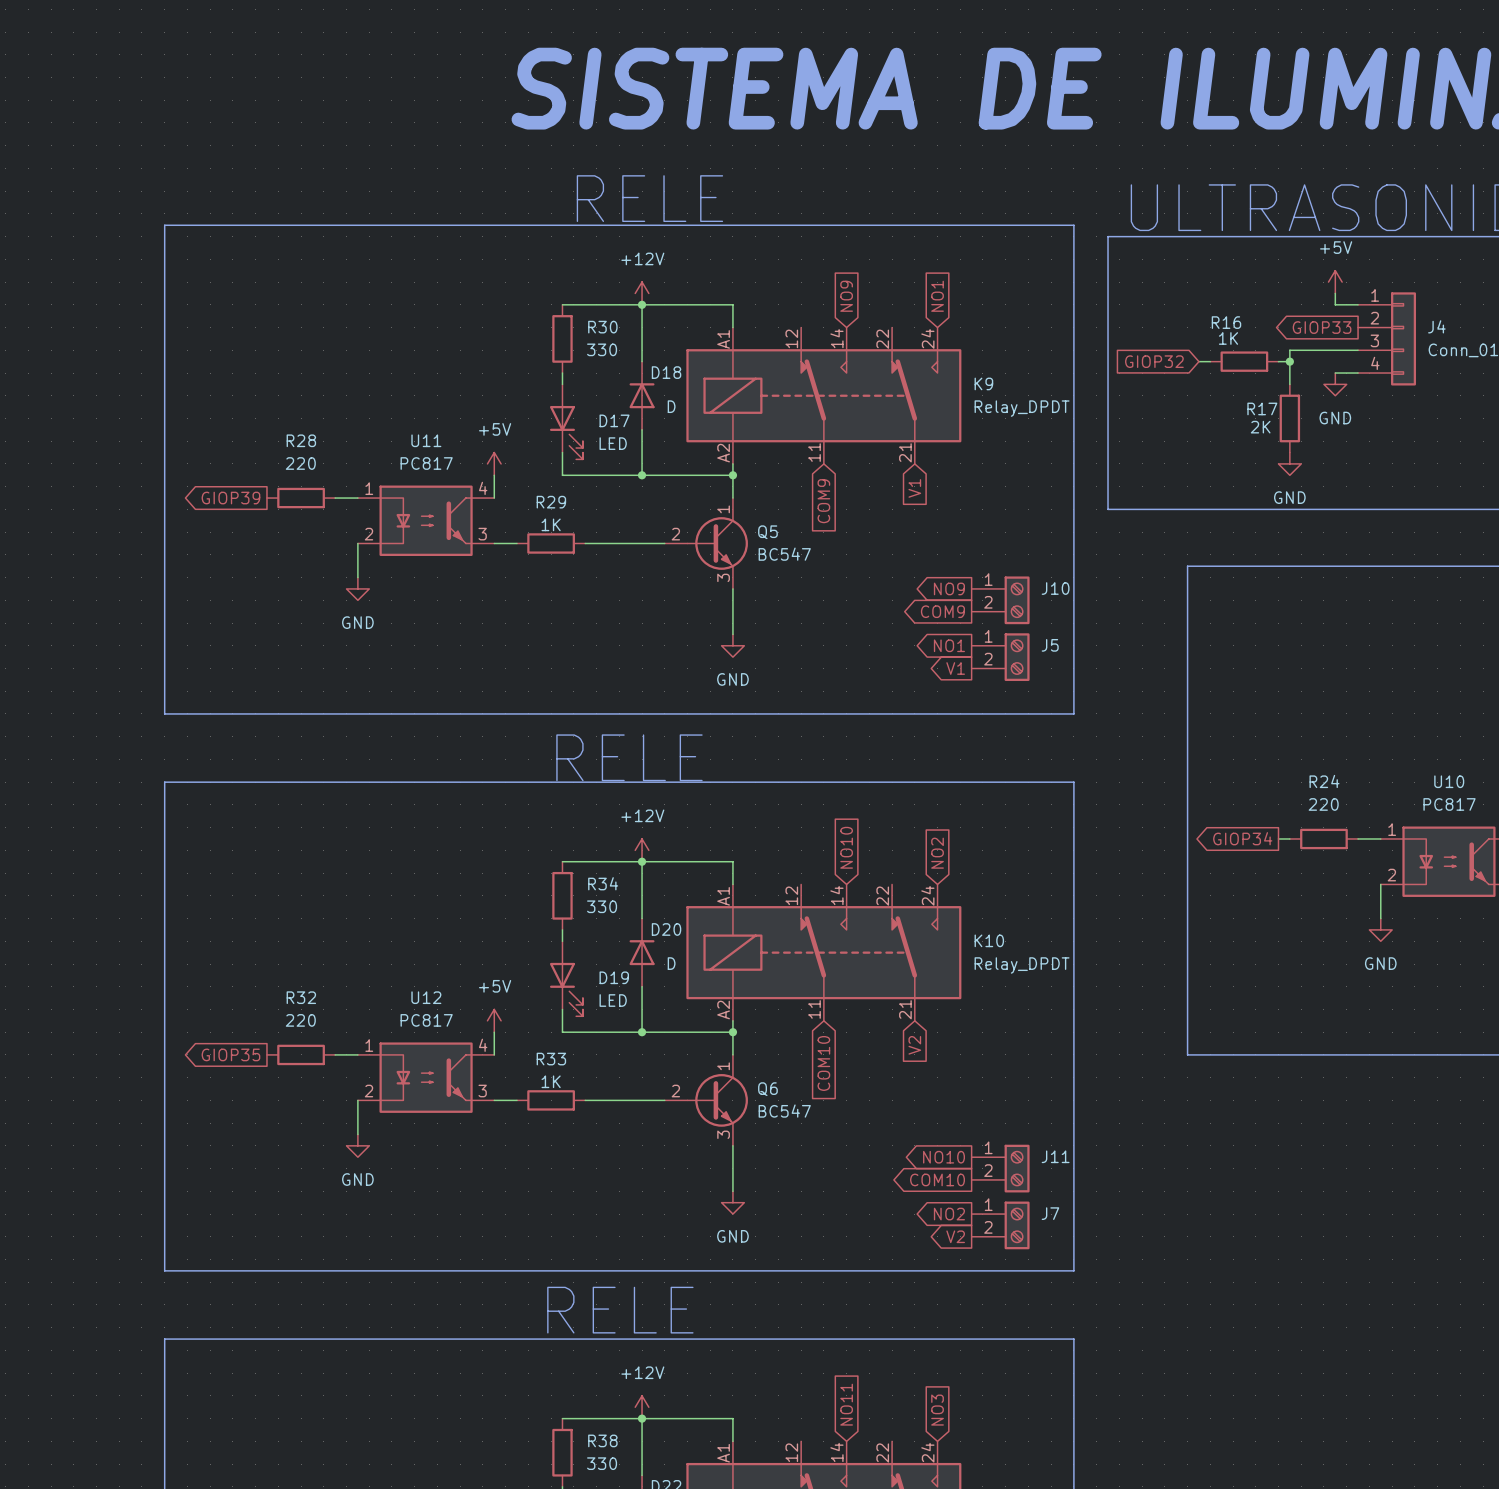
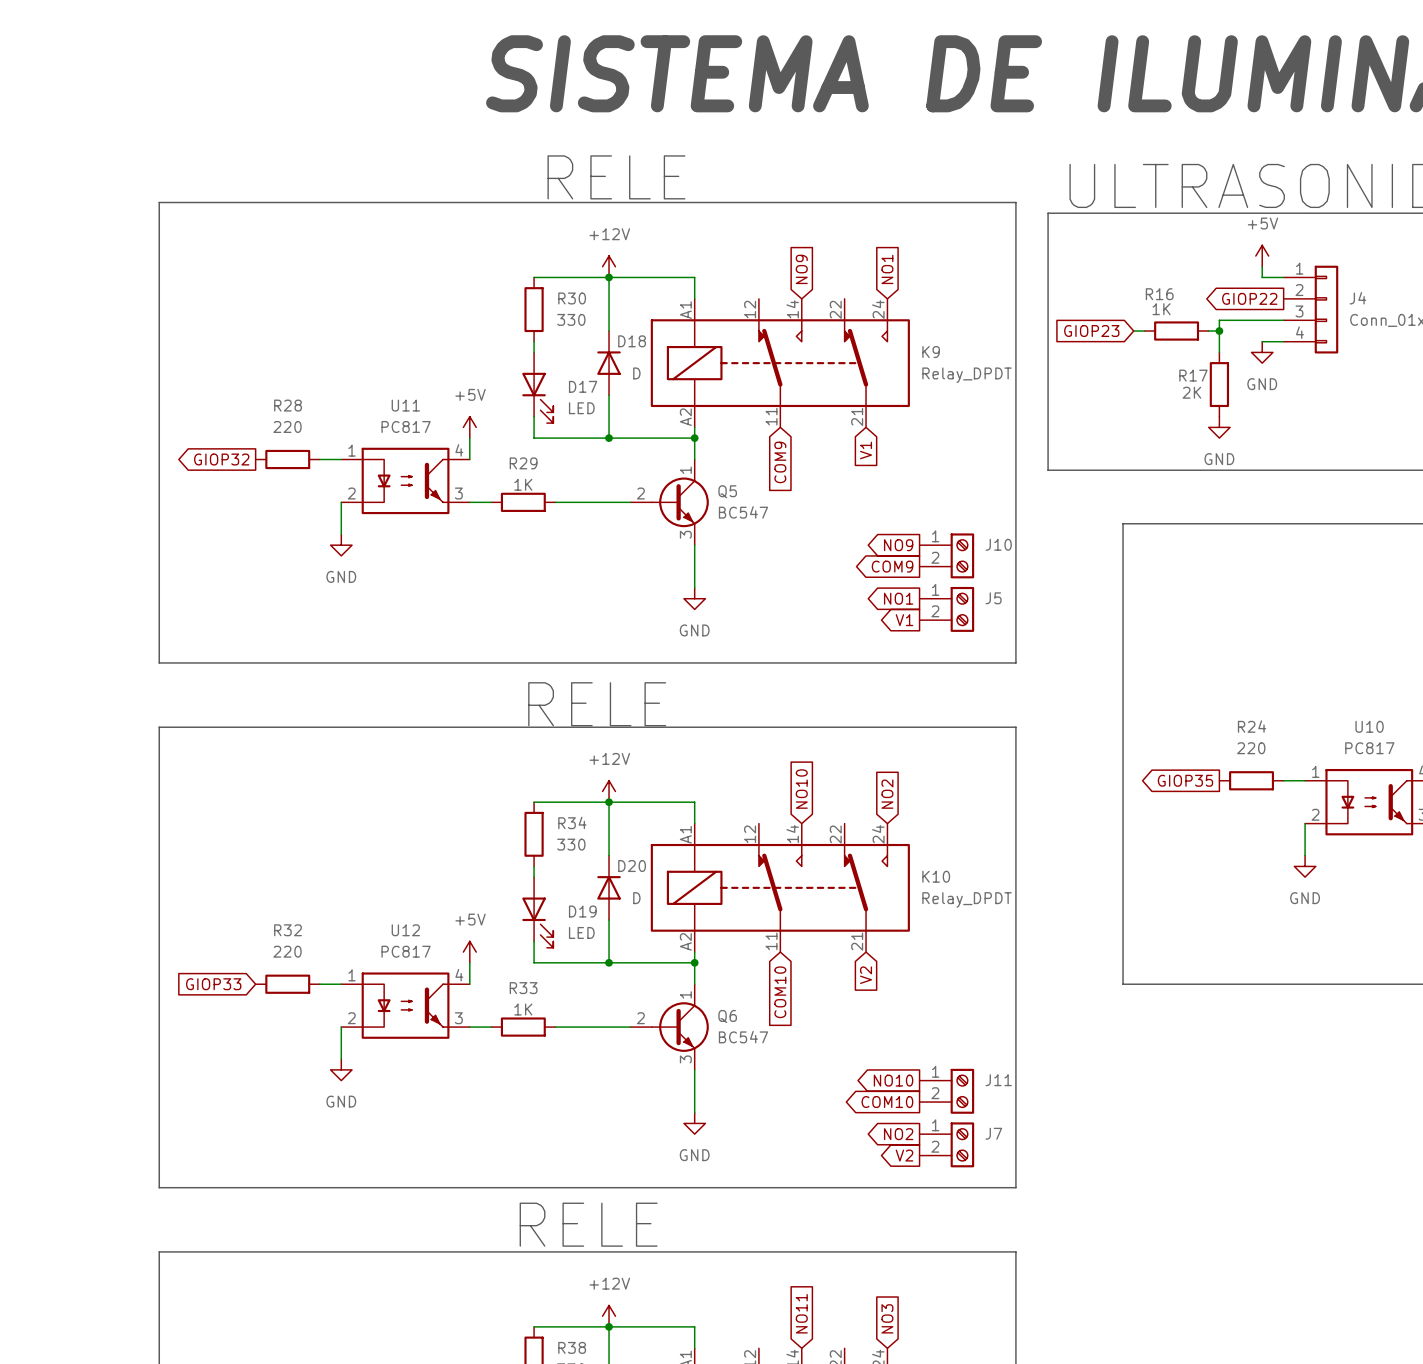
global label: GIOP33 (1322, 327) -> GIOP22 (1249, 298)
global label: GIOP32 (1154, 361) -> GIOP23 (1091, 331)
global label: GIOP39 (230, 498) -> GIOP32 (221, 459)
global label: GIOP34 (1242, 838) -> GIOP35 (1185, 780)
wire: (1278, 838) (1289, 838) -> none
global label shape: output (230, 1054) -> input (213, 984)
global label: GIOP35 (230, 1054) -> GIOP33 (213, 984)

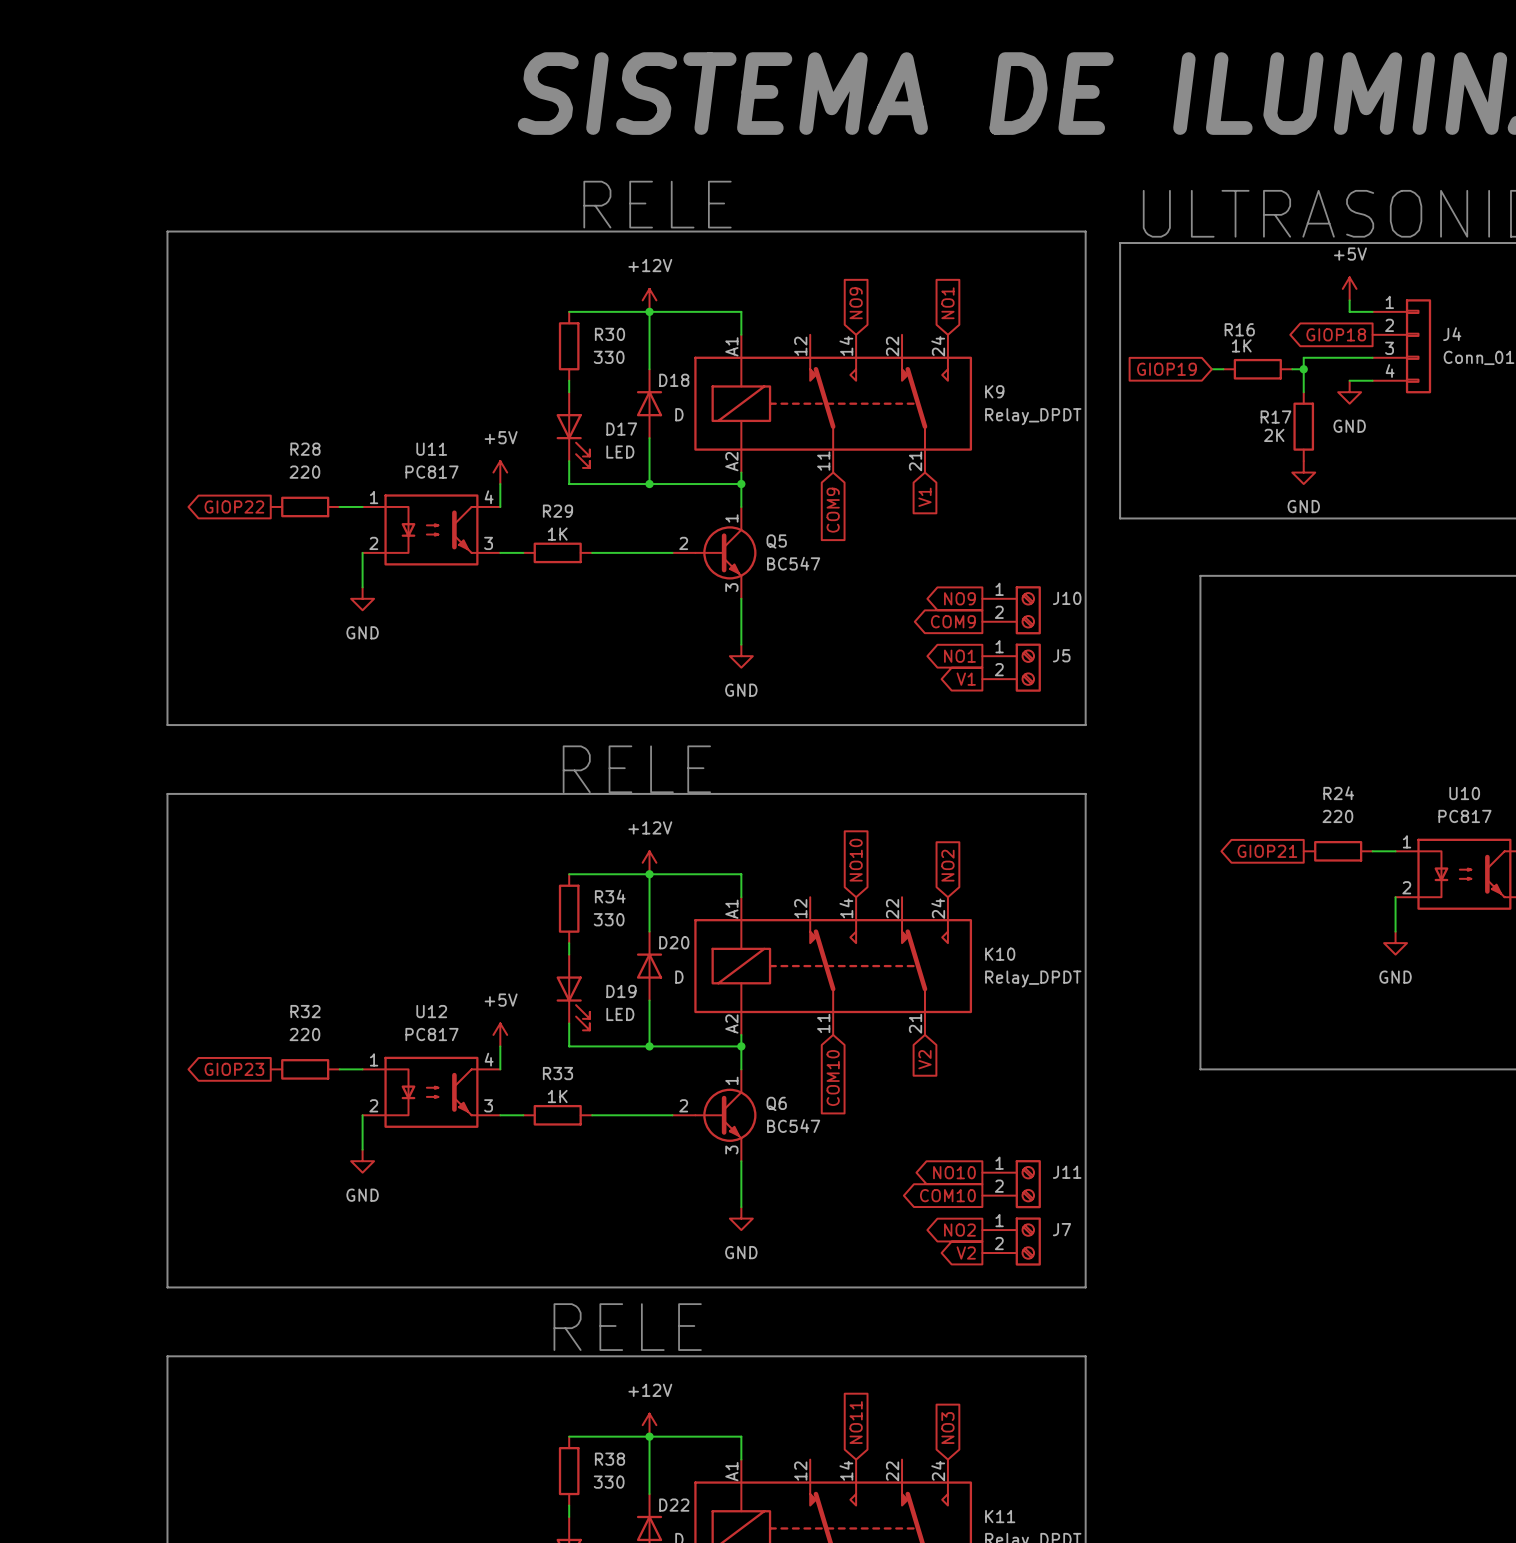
global label: GIOP22 (1249, 298) -> GIOP18 (1336, 334)
global label: GIOP23 (1091, 331) -> GIOP19 (1166, 369)
global label: GIOP32 (221, 459) -> GIOP22 (234, 506)
global label: GIOP35 (1185, 780) -> GIOP21 (1267, 851)
global label shape: input (213, 984) -> output (234, 1069)
global label: GIOP33 (213, 984) -> GIOP23 (234, 1069)

